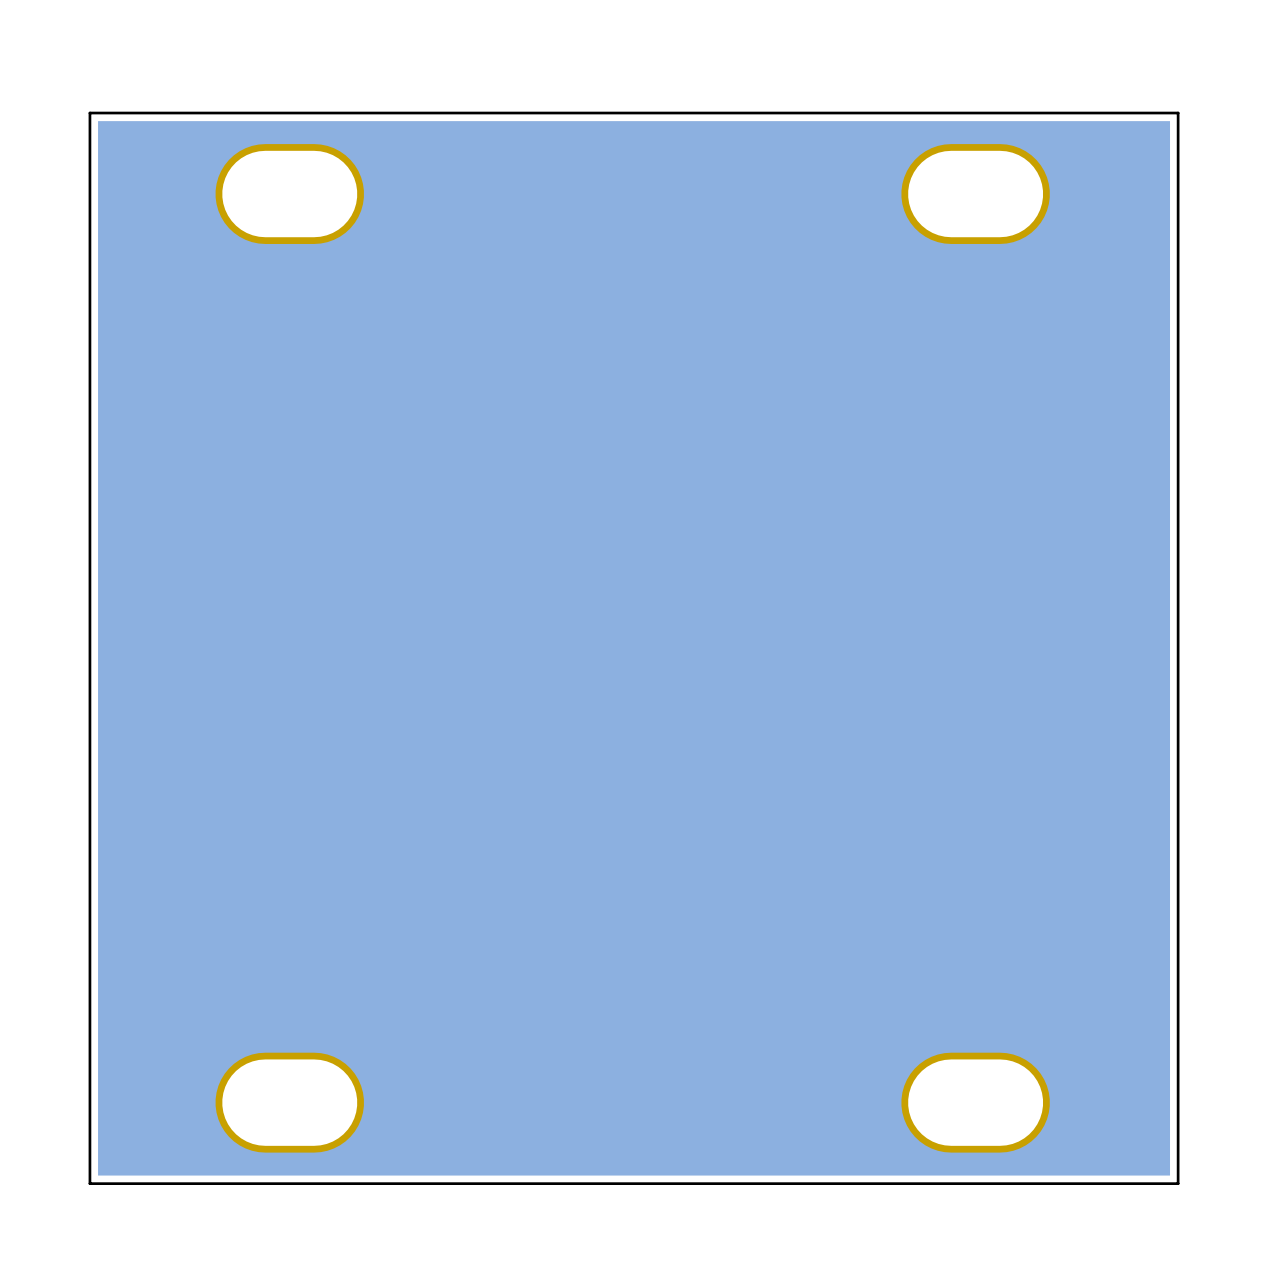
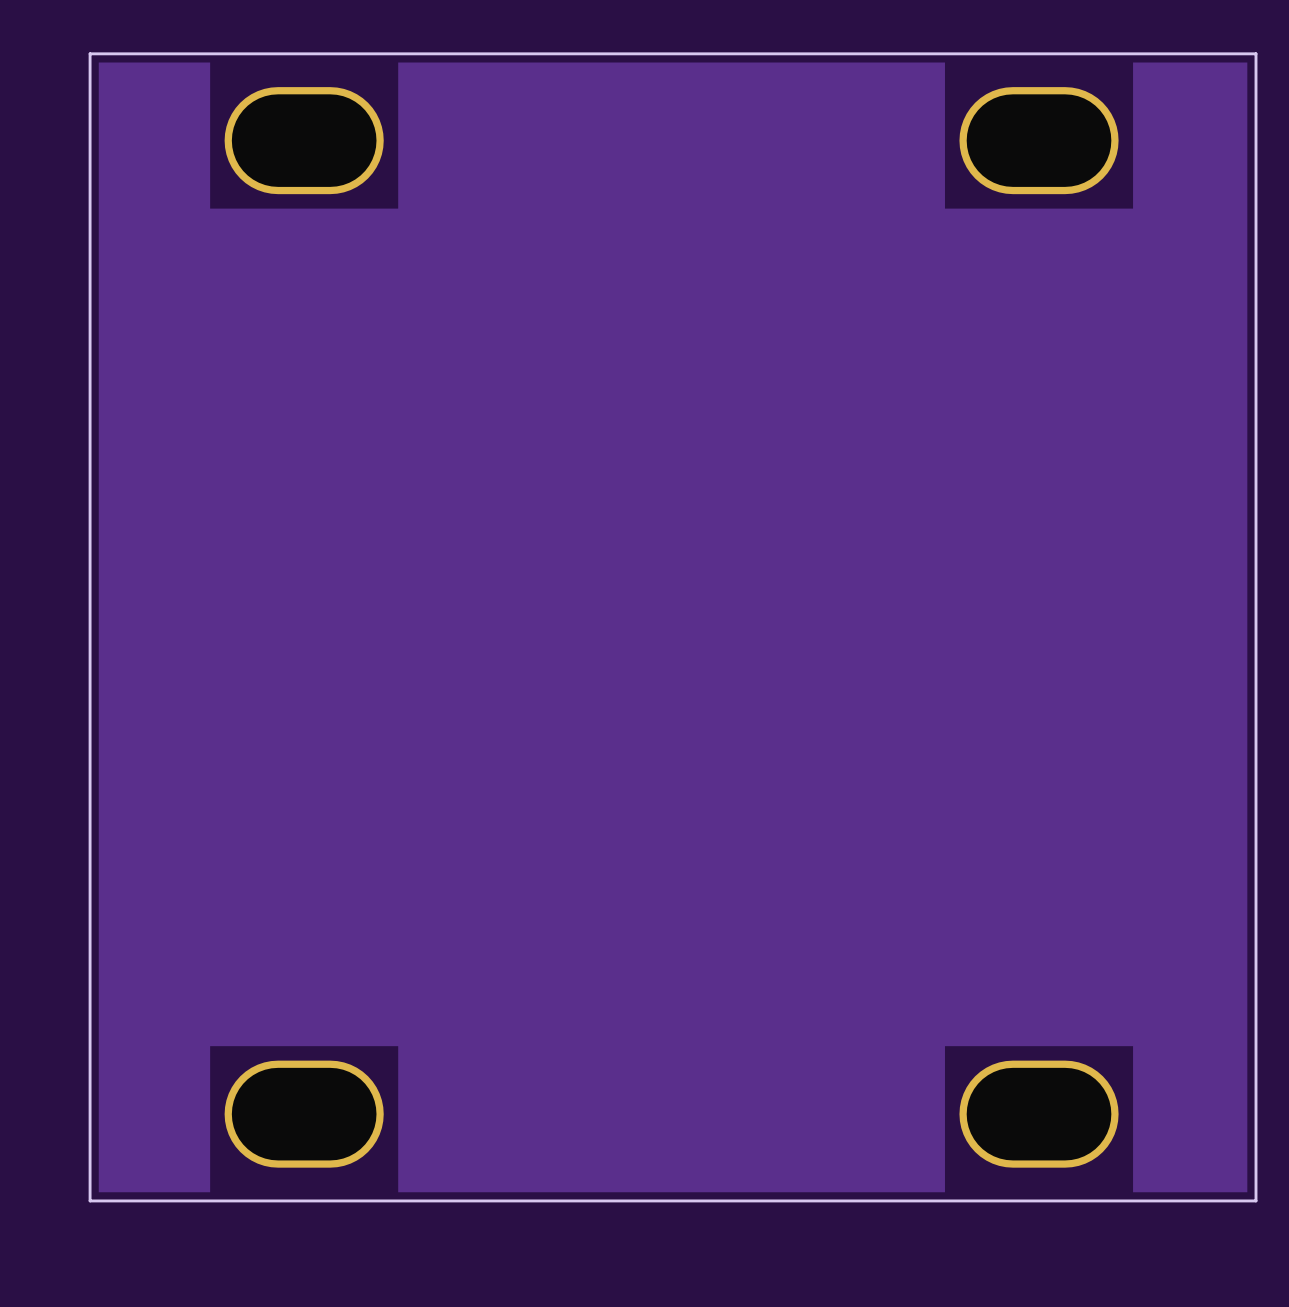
drawing shape: [98, 121, 1171, 1176] -> [210, 208, 1134, 1047]
drawing: none -> [98, 62, 211, 1193]
drawing: none -> [398, 62, 945, 209]
drawing: none -> [1133, 62, 1248, 1193]
drawing: none -> [398, 1046, 945, 1193]

